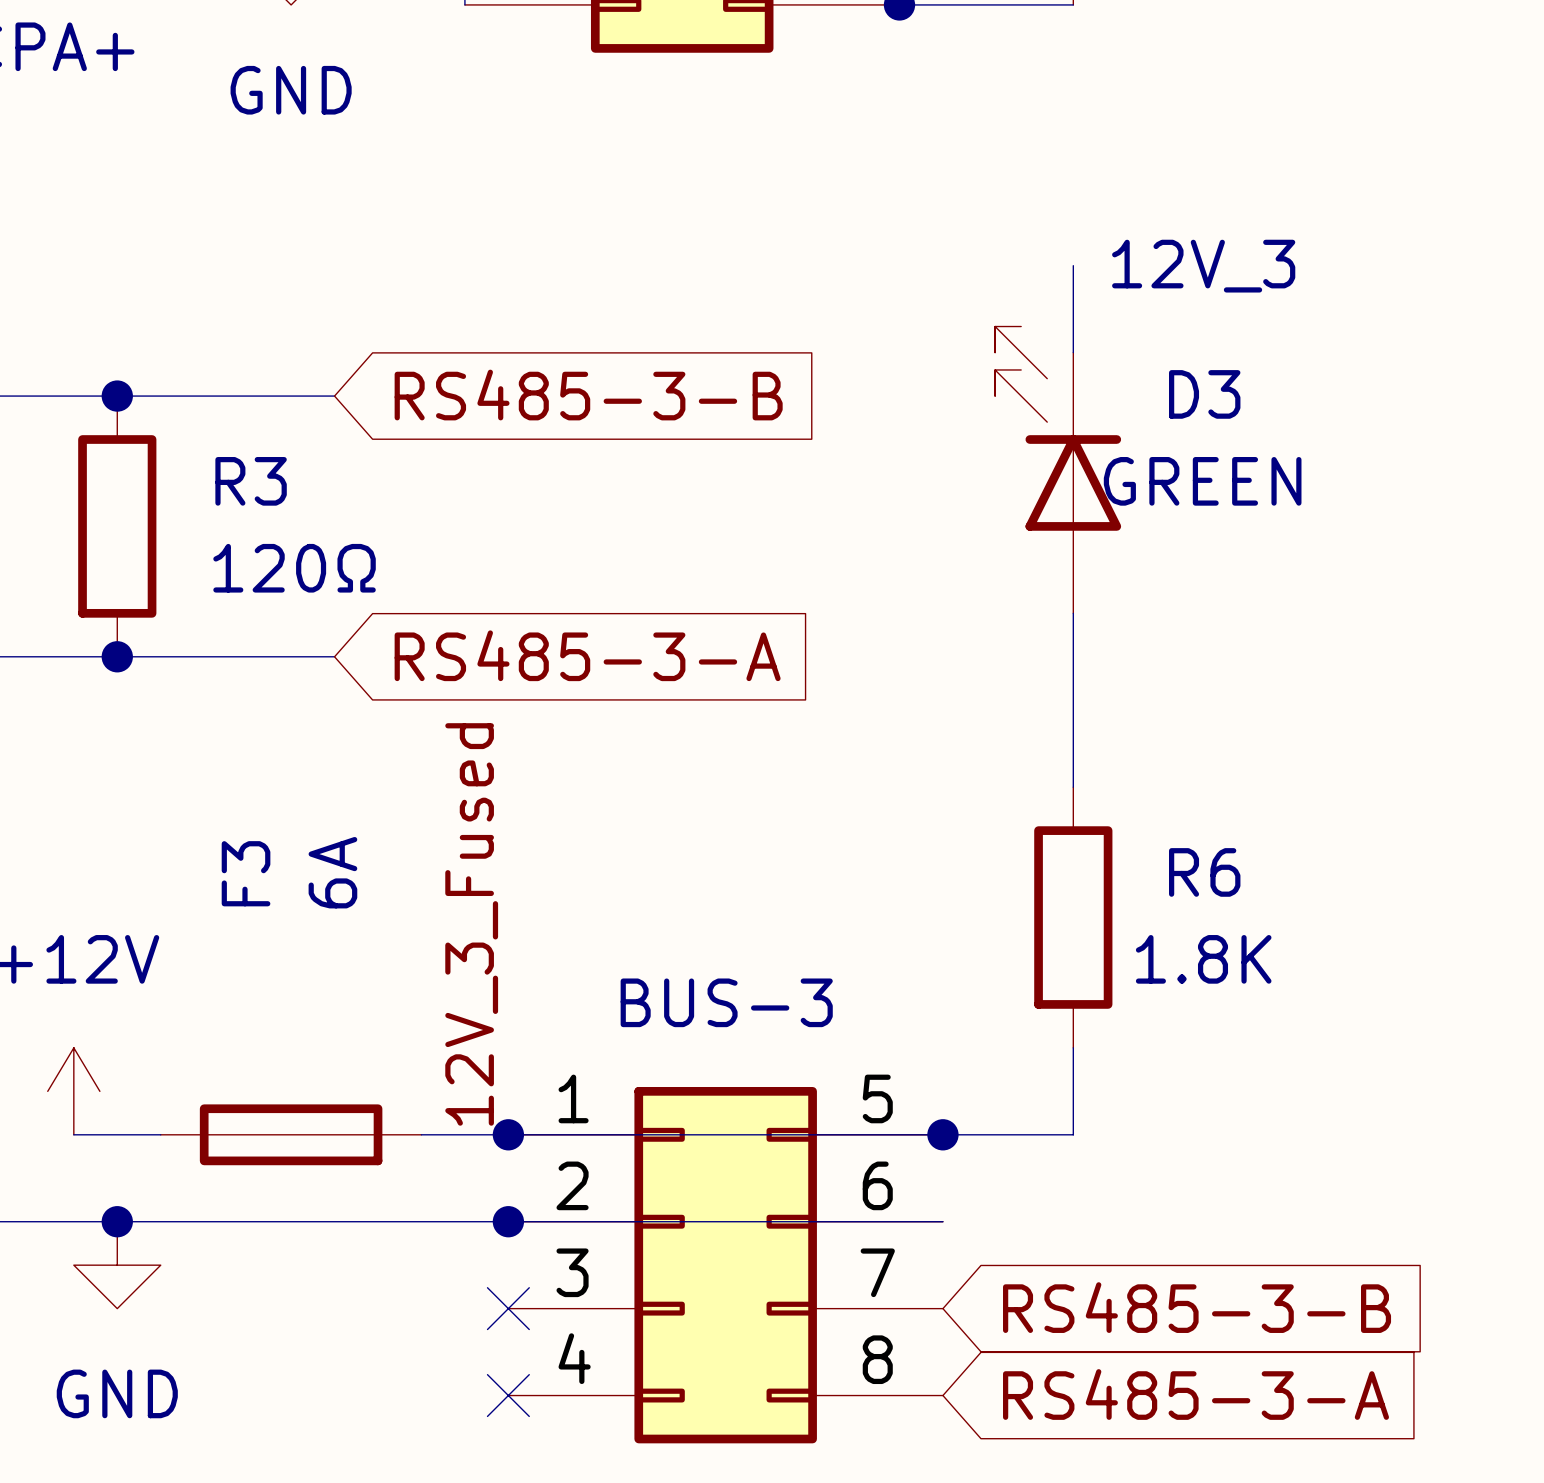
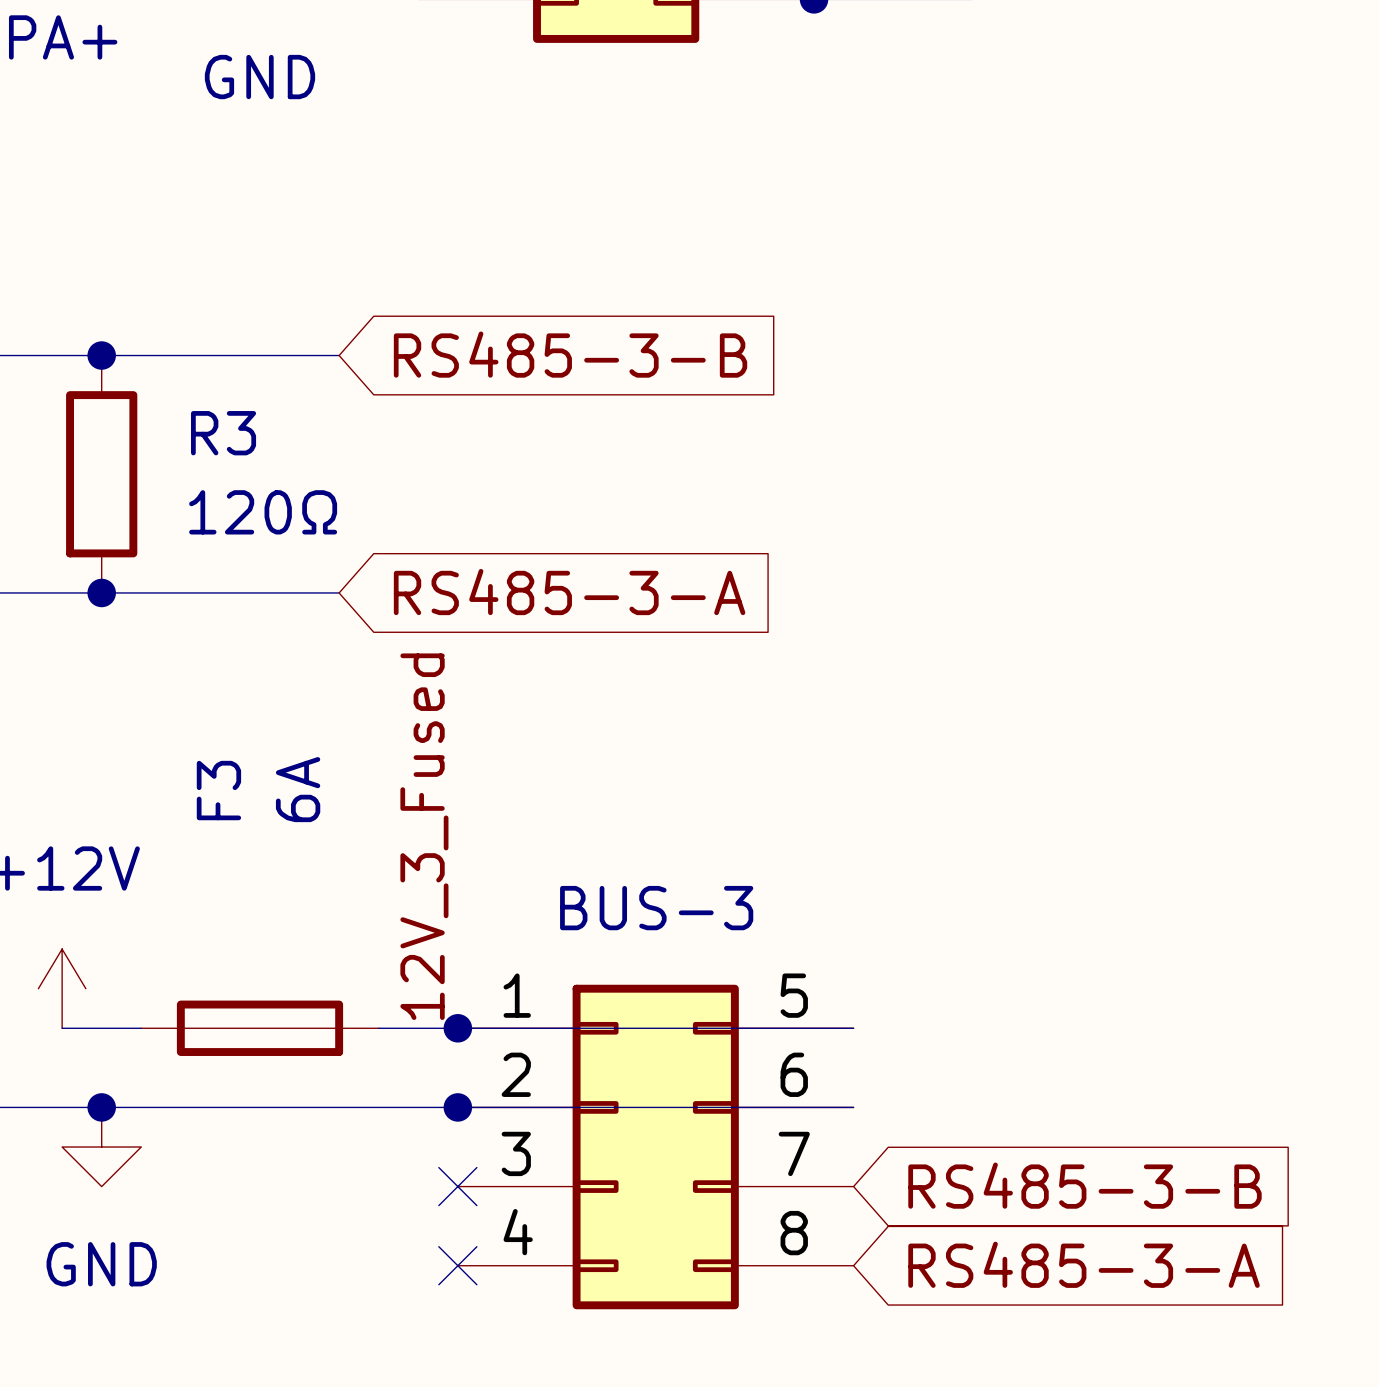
wire: (1073, 265) (1073, 352) -> none
global label position: RS485-3-B (588, 395) -> RS485-3-B (570, 354)
wire: none -> (299, 355) (339, 355)
D3: GREEN (1058, 469) -> none
wire: (1073, 613) (1073, 787) -> none
global label position: RS485-3-A (587, 655) -> RS485-3-A (569, 592)
wire: none -> (299, 592) (339, 592)
R6: 1.8K (1073, 917) -> none
wire: (1073, 1047) (1073, 1134) (942, 1134) -> none
junction: (942, 1134) -> none

